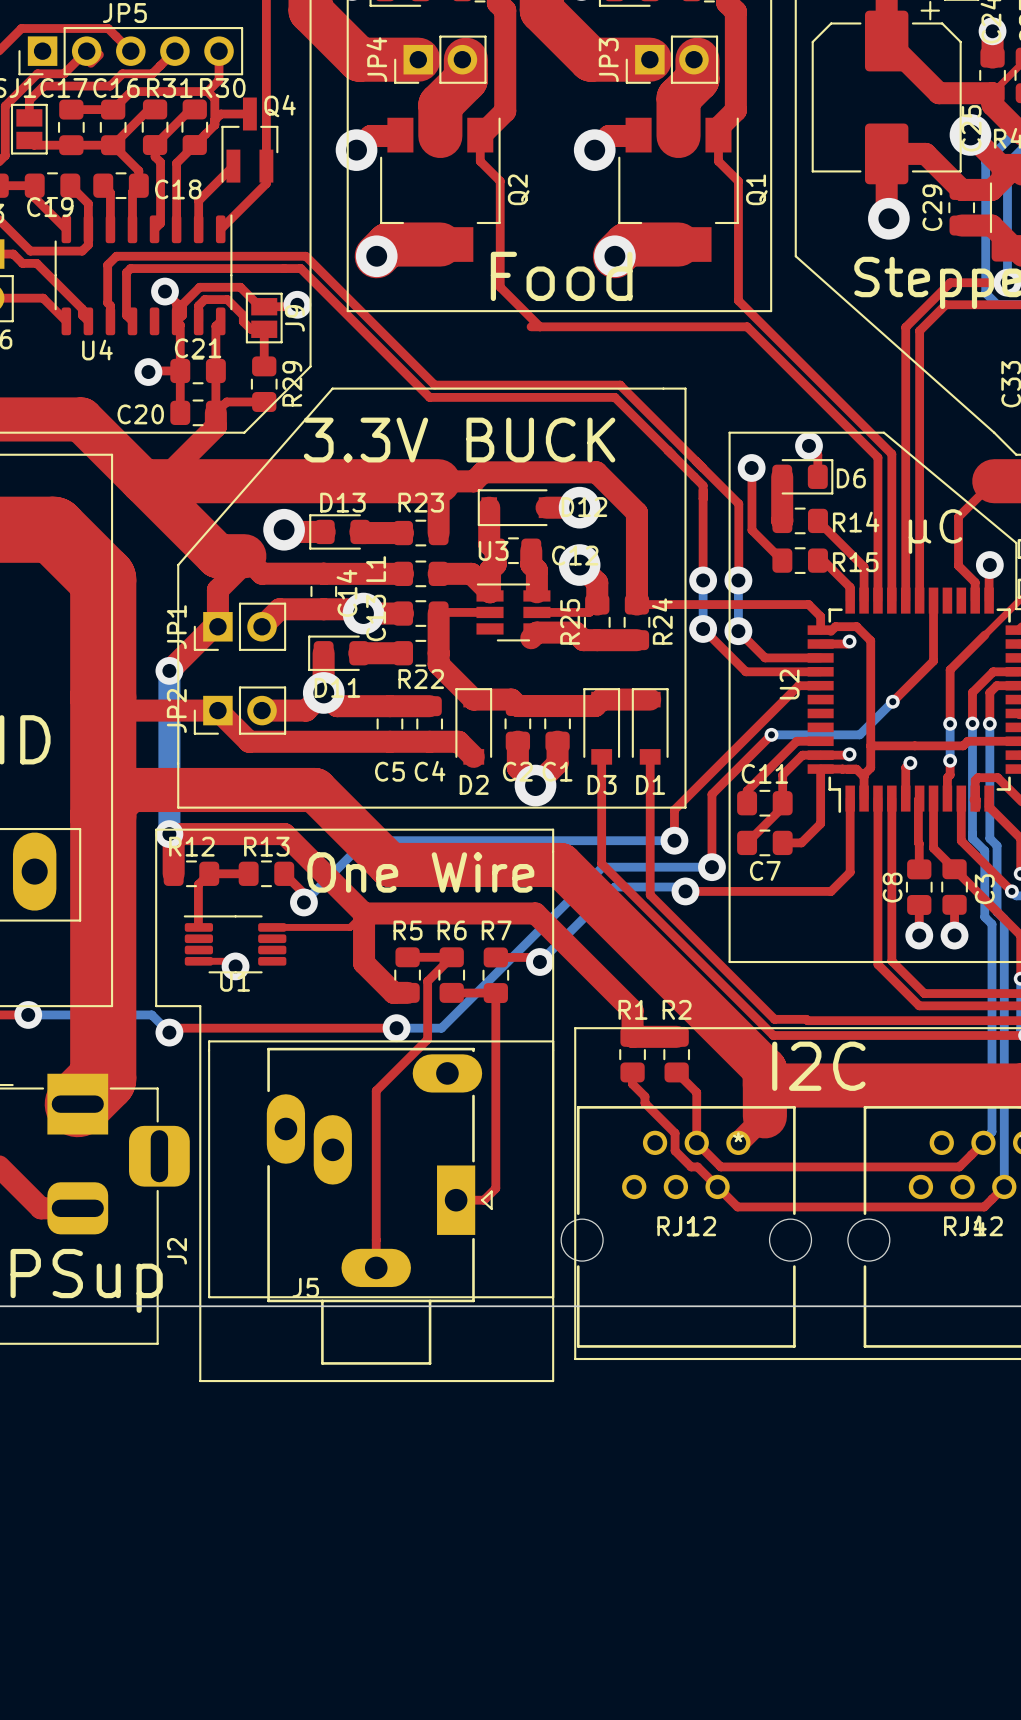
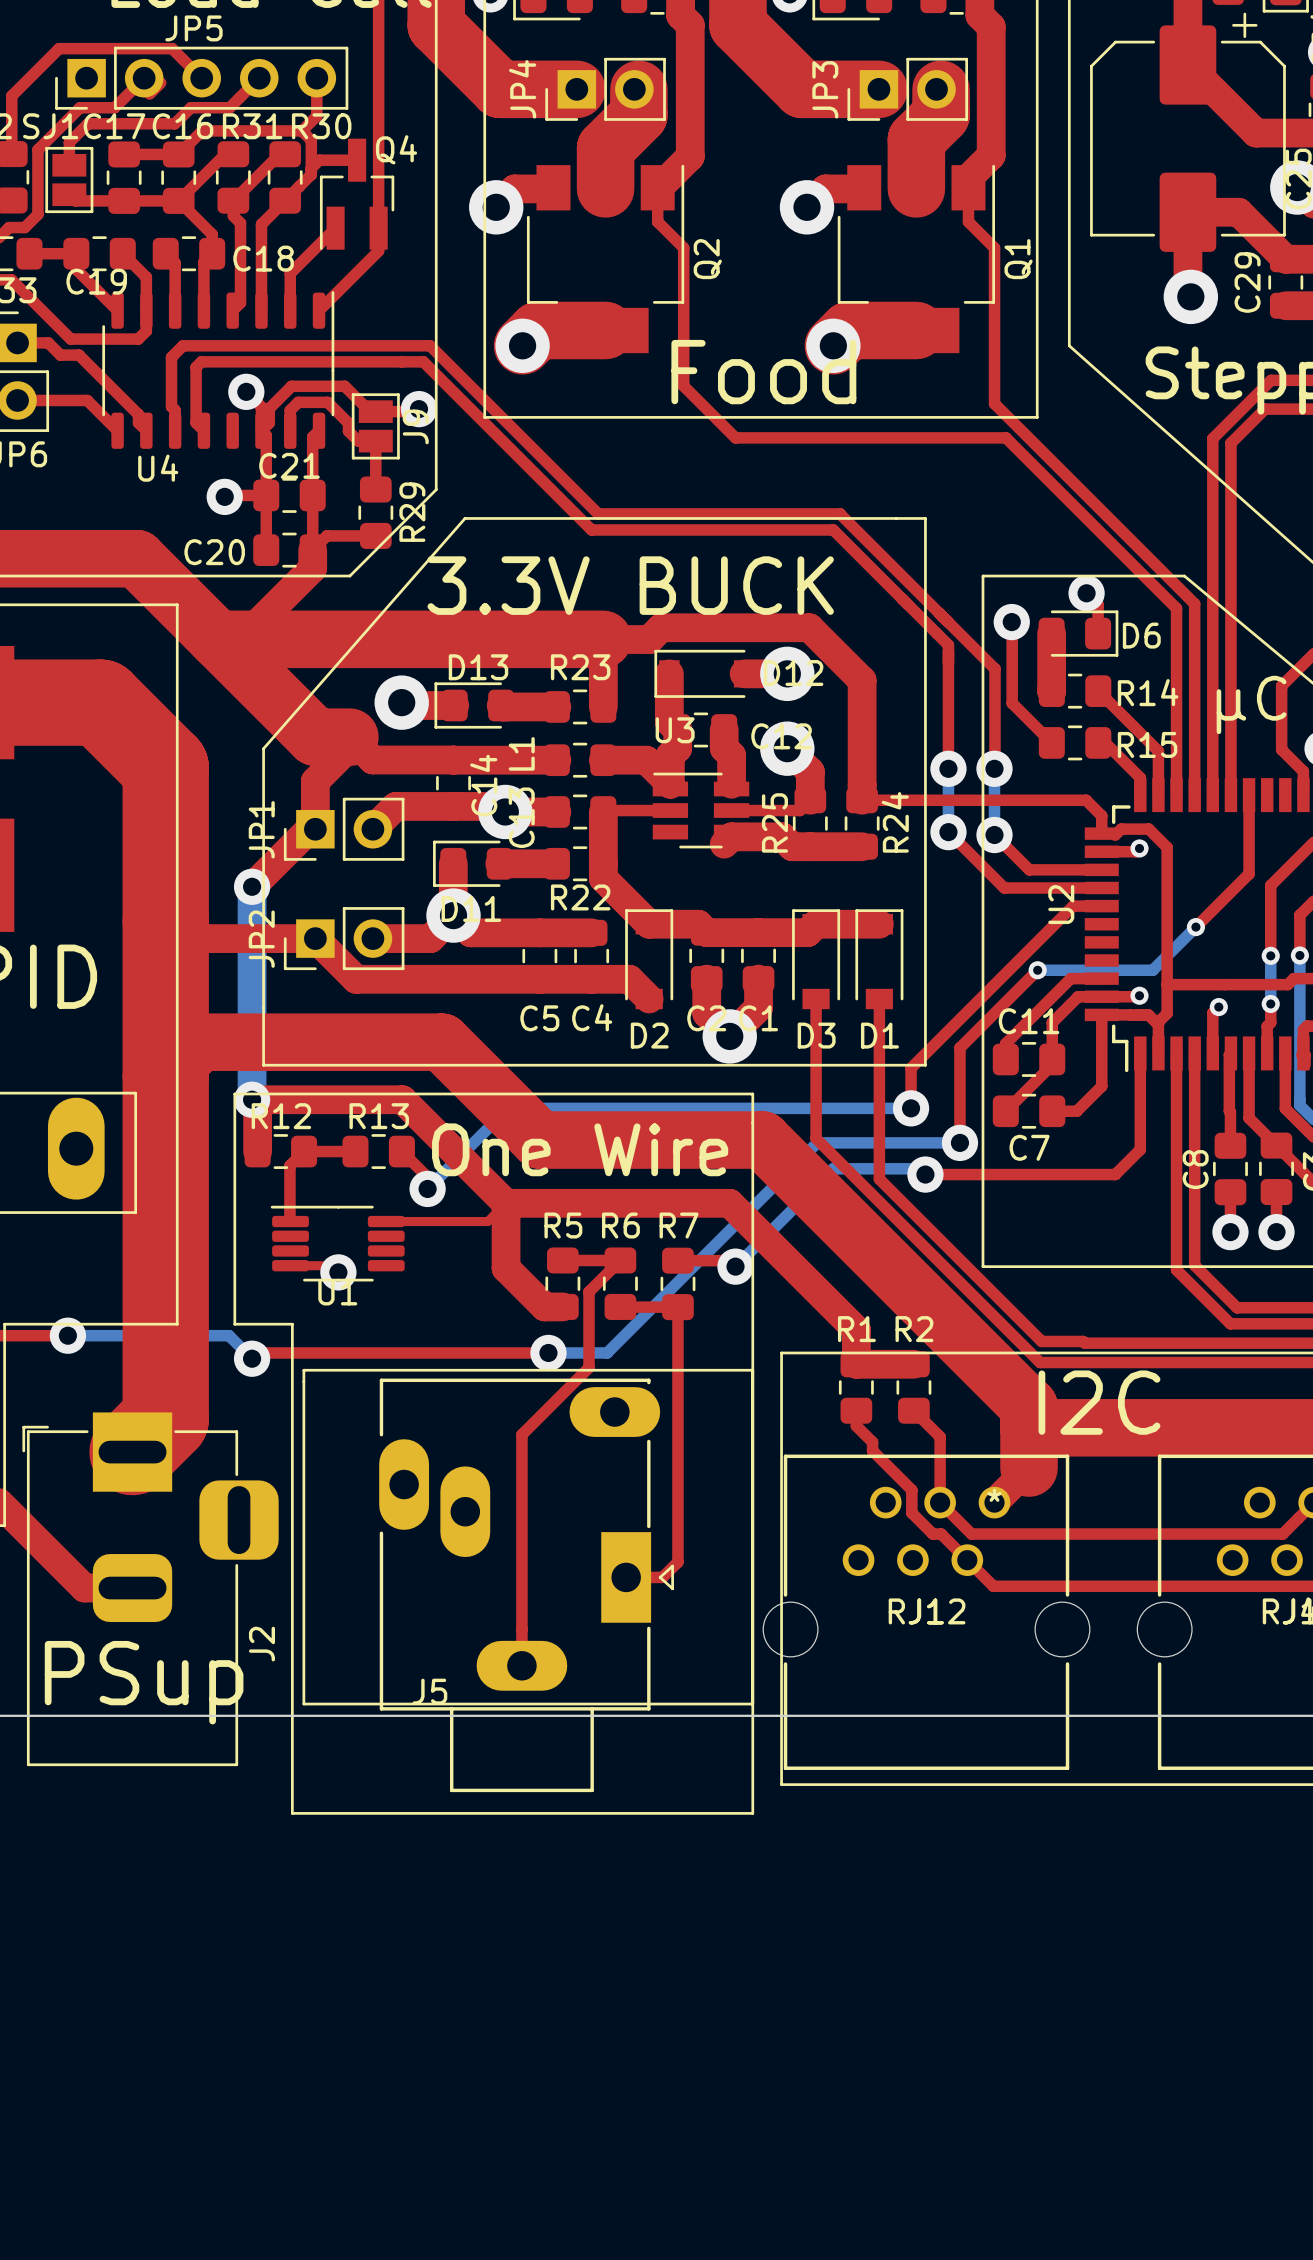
top track: (531, 326) (539, 326) -> none

